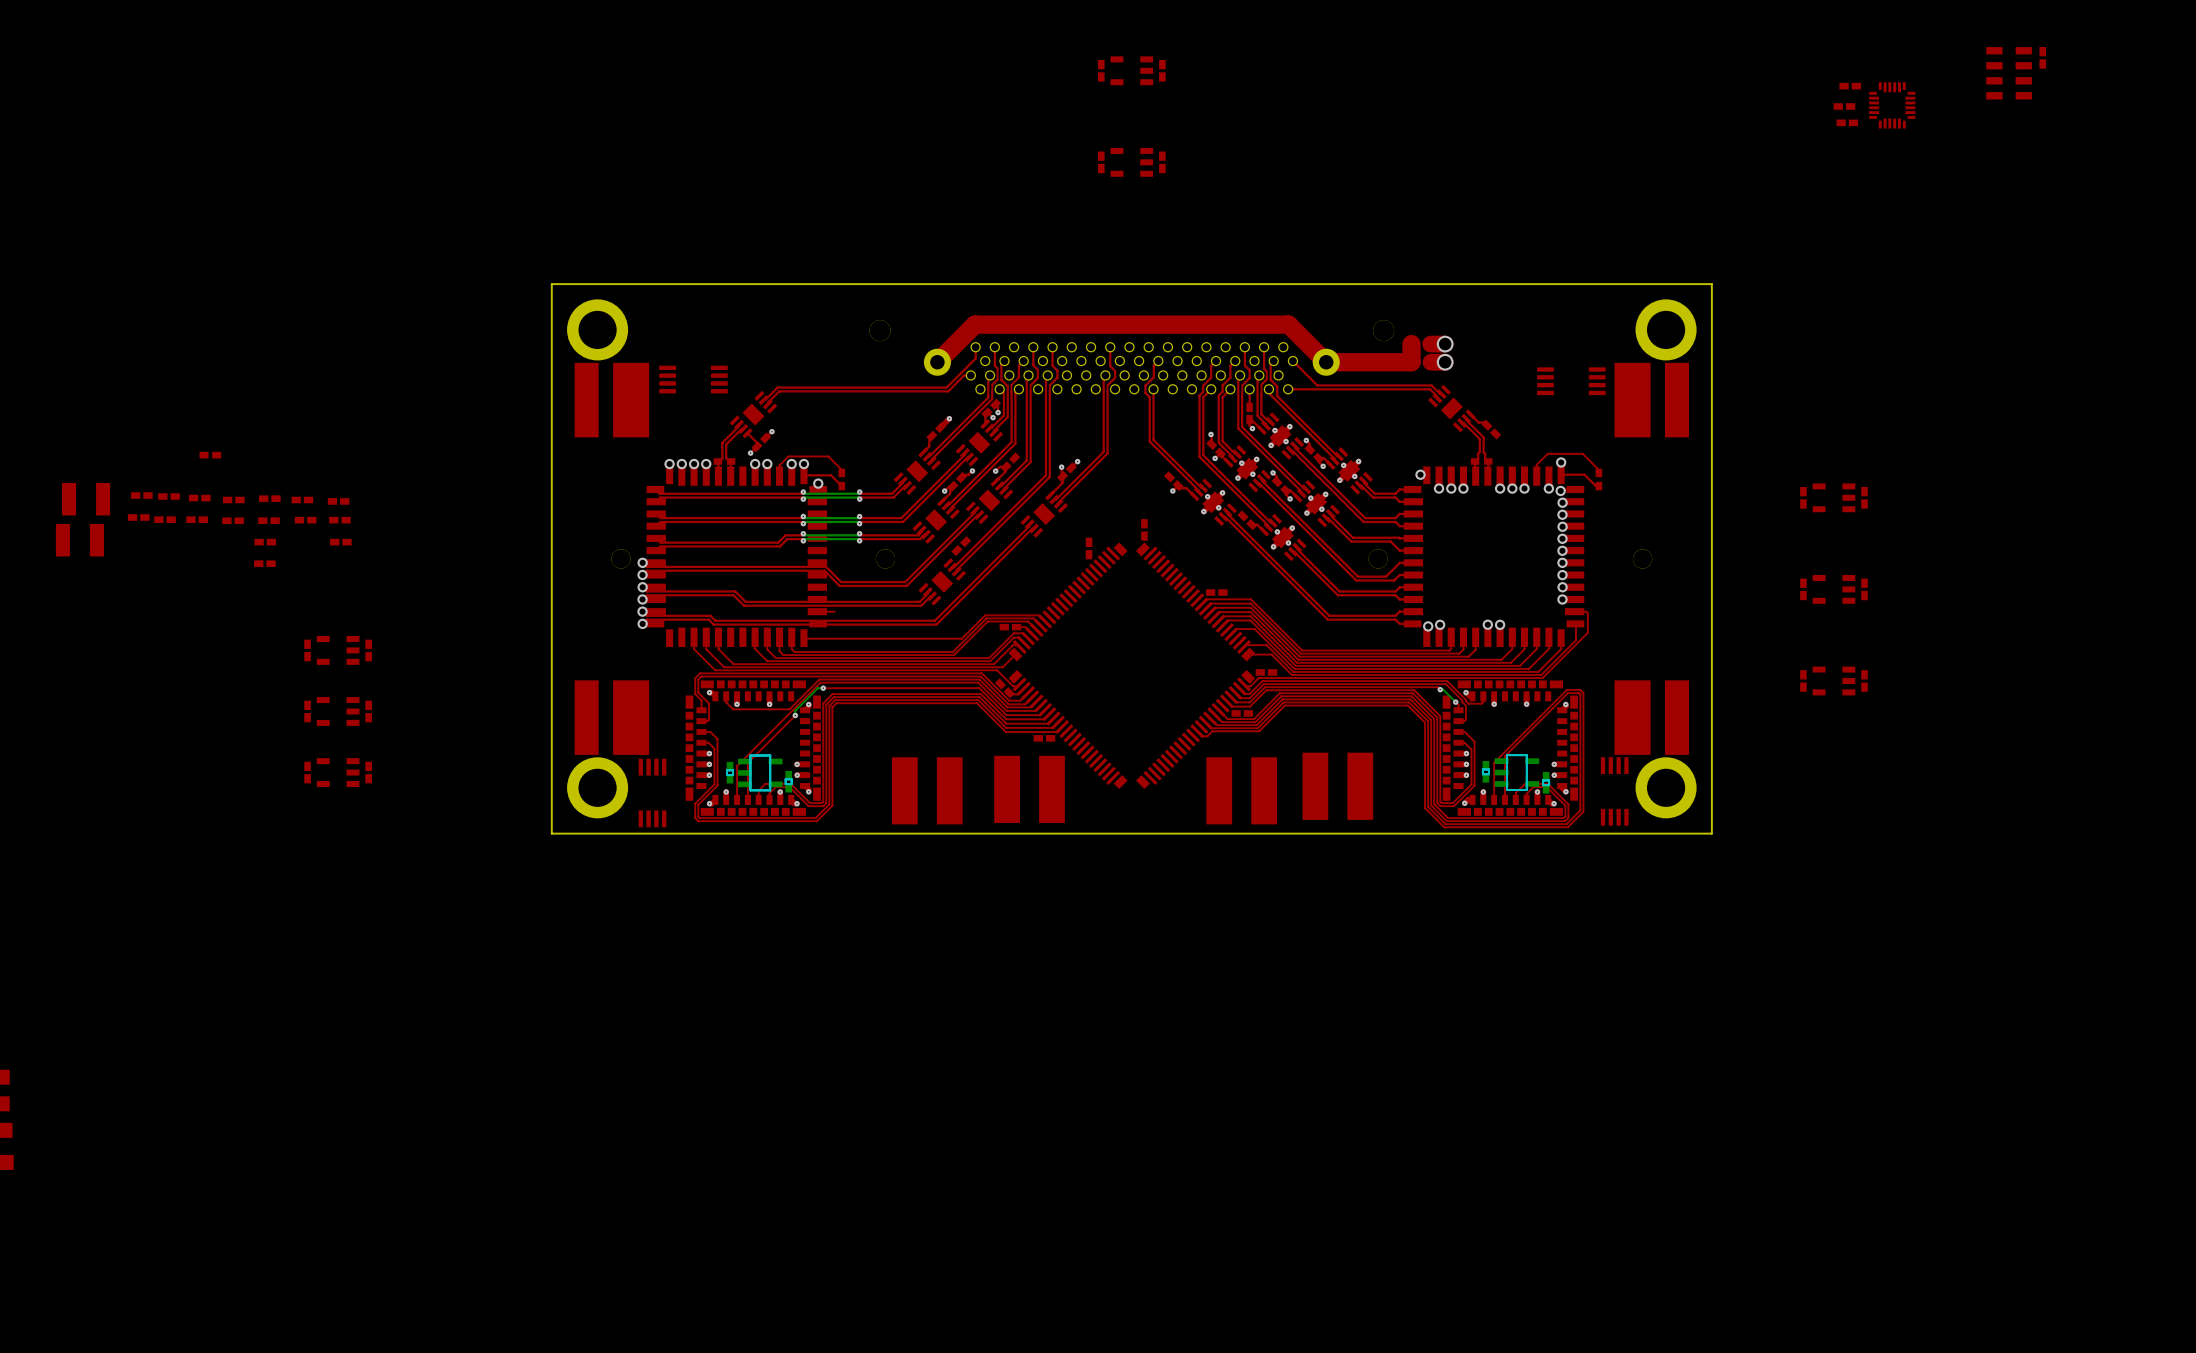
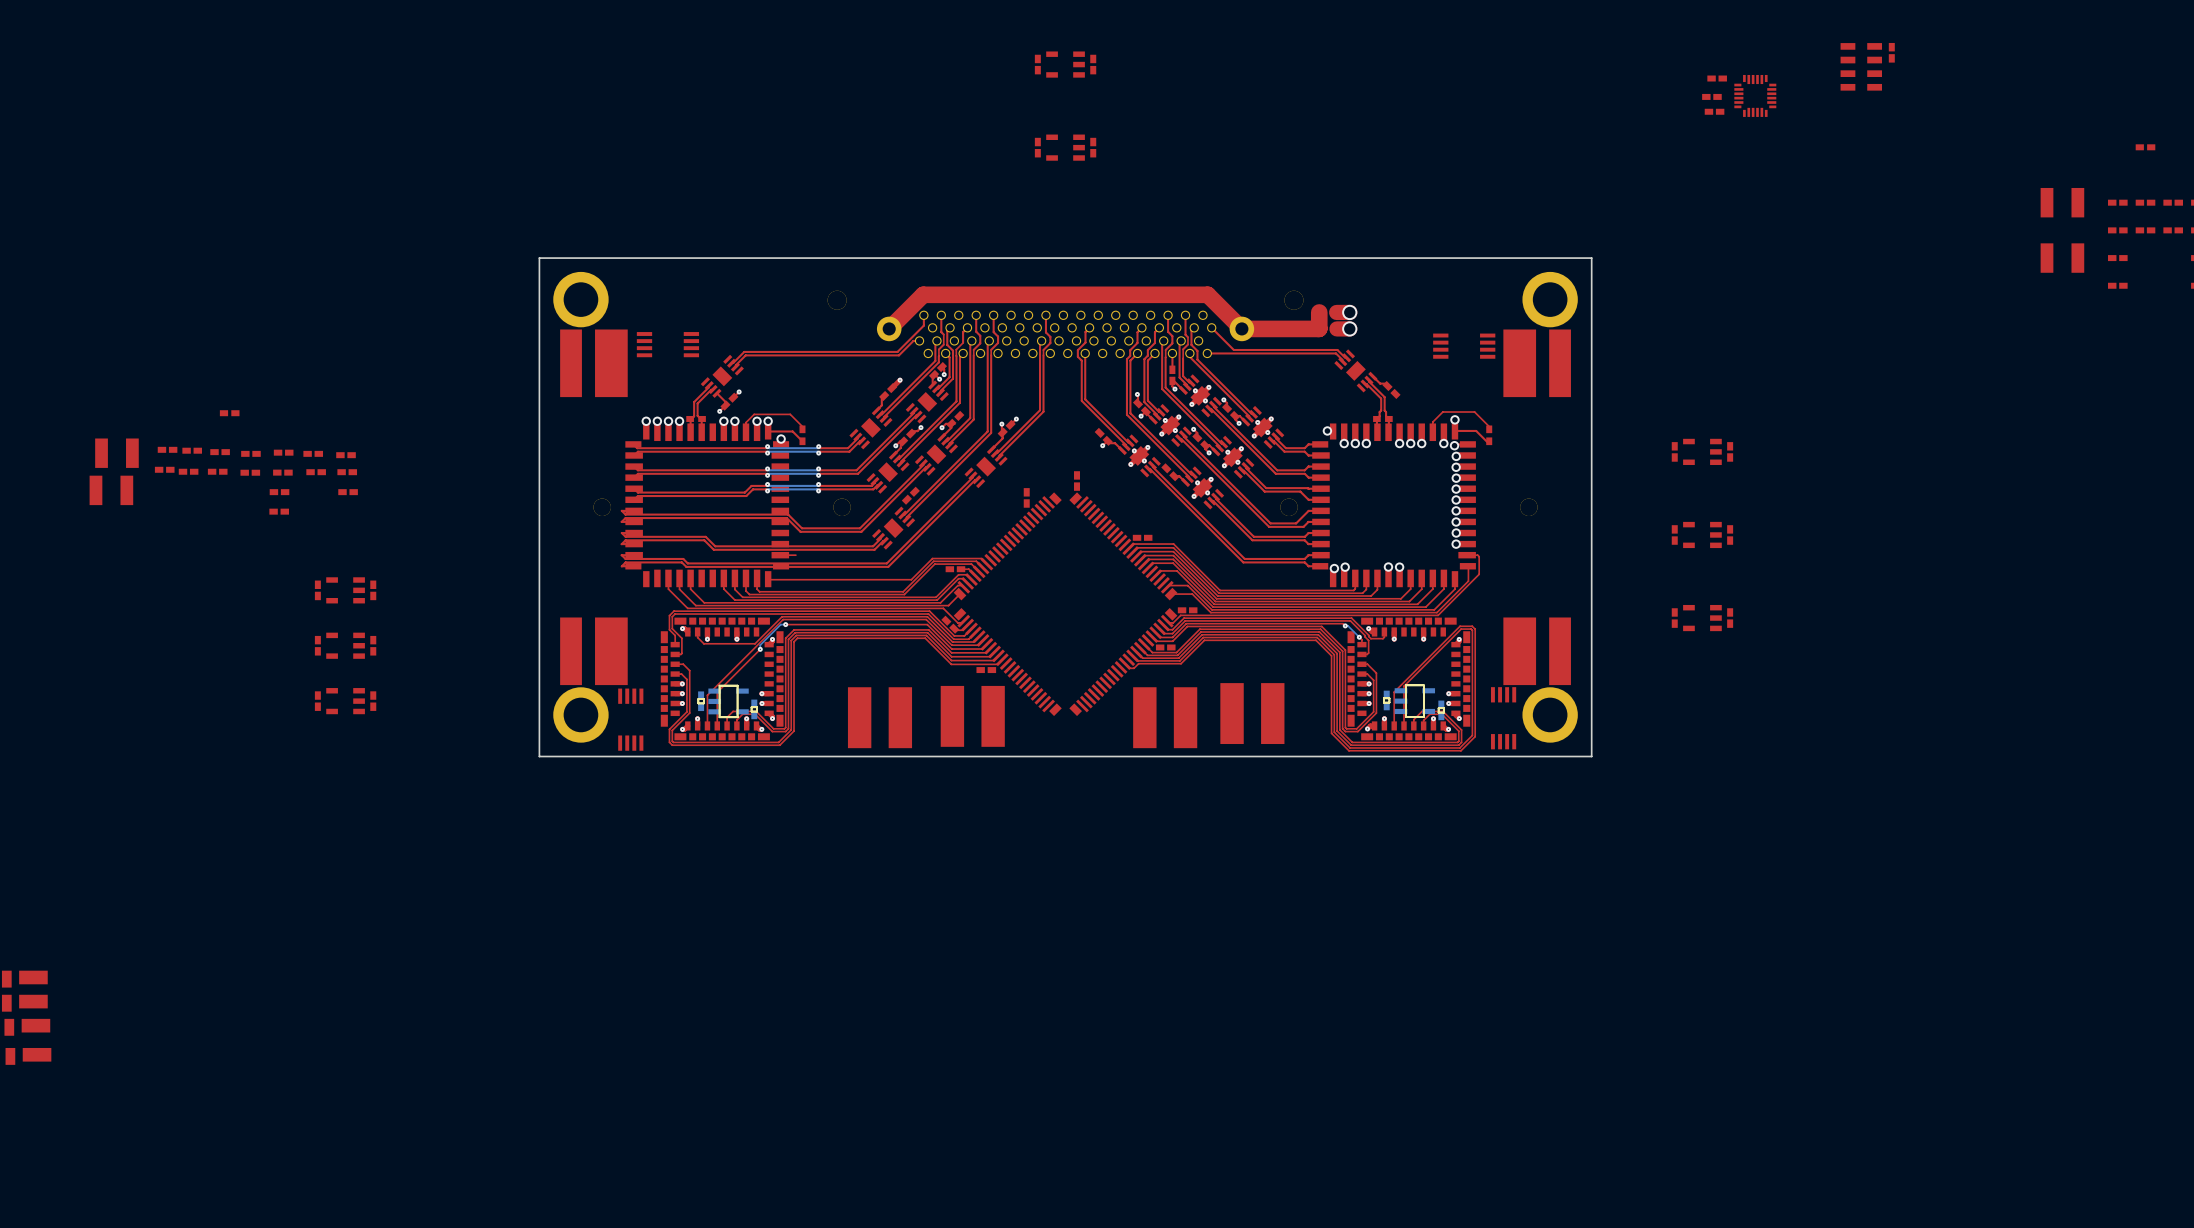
via: (642, 562) -> none
via: (642, 574) -> none
via: (642, 587) -> none
via: (642, 599) -> none
via: (642, 611) -> none
via: (642, 623) -> none

